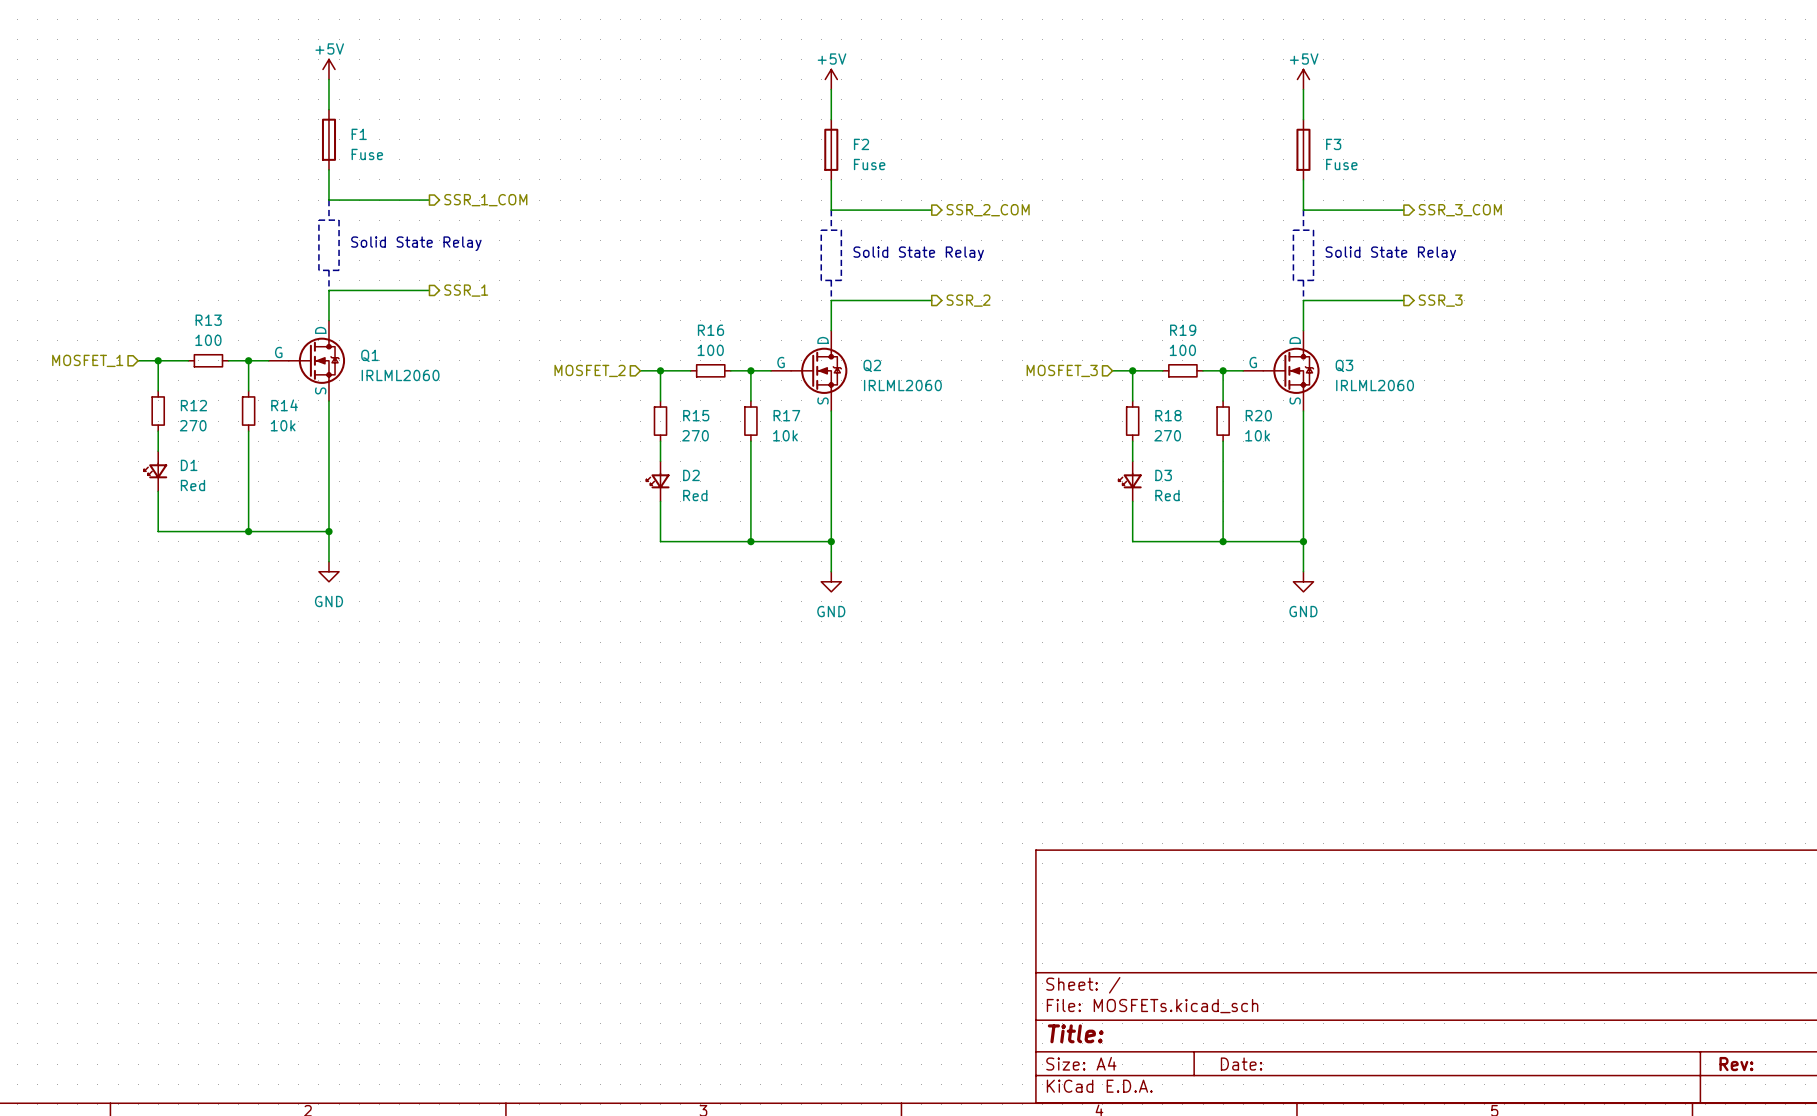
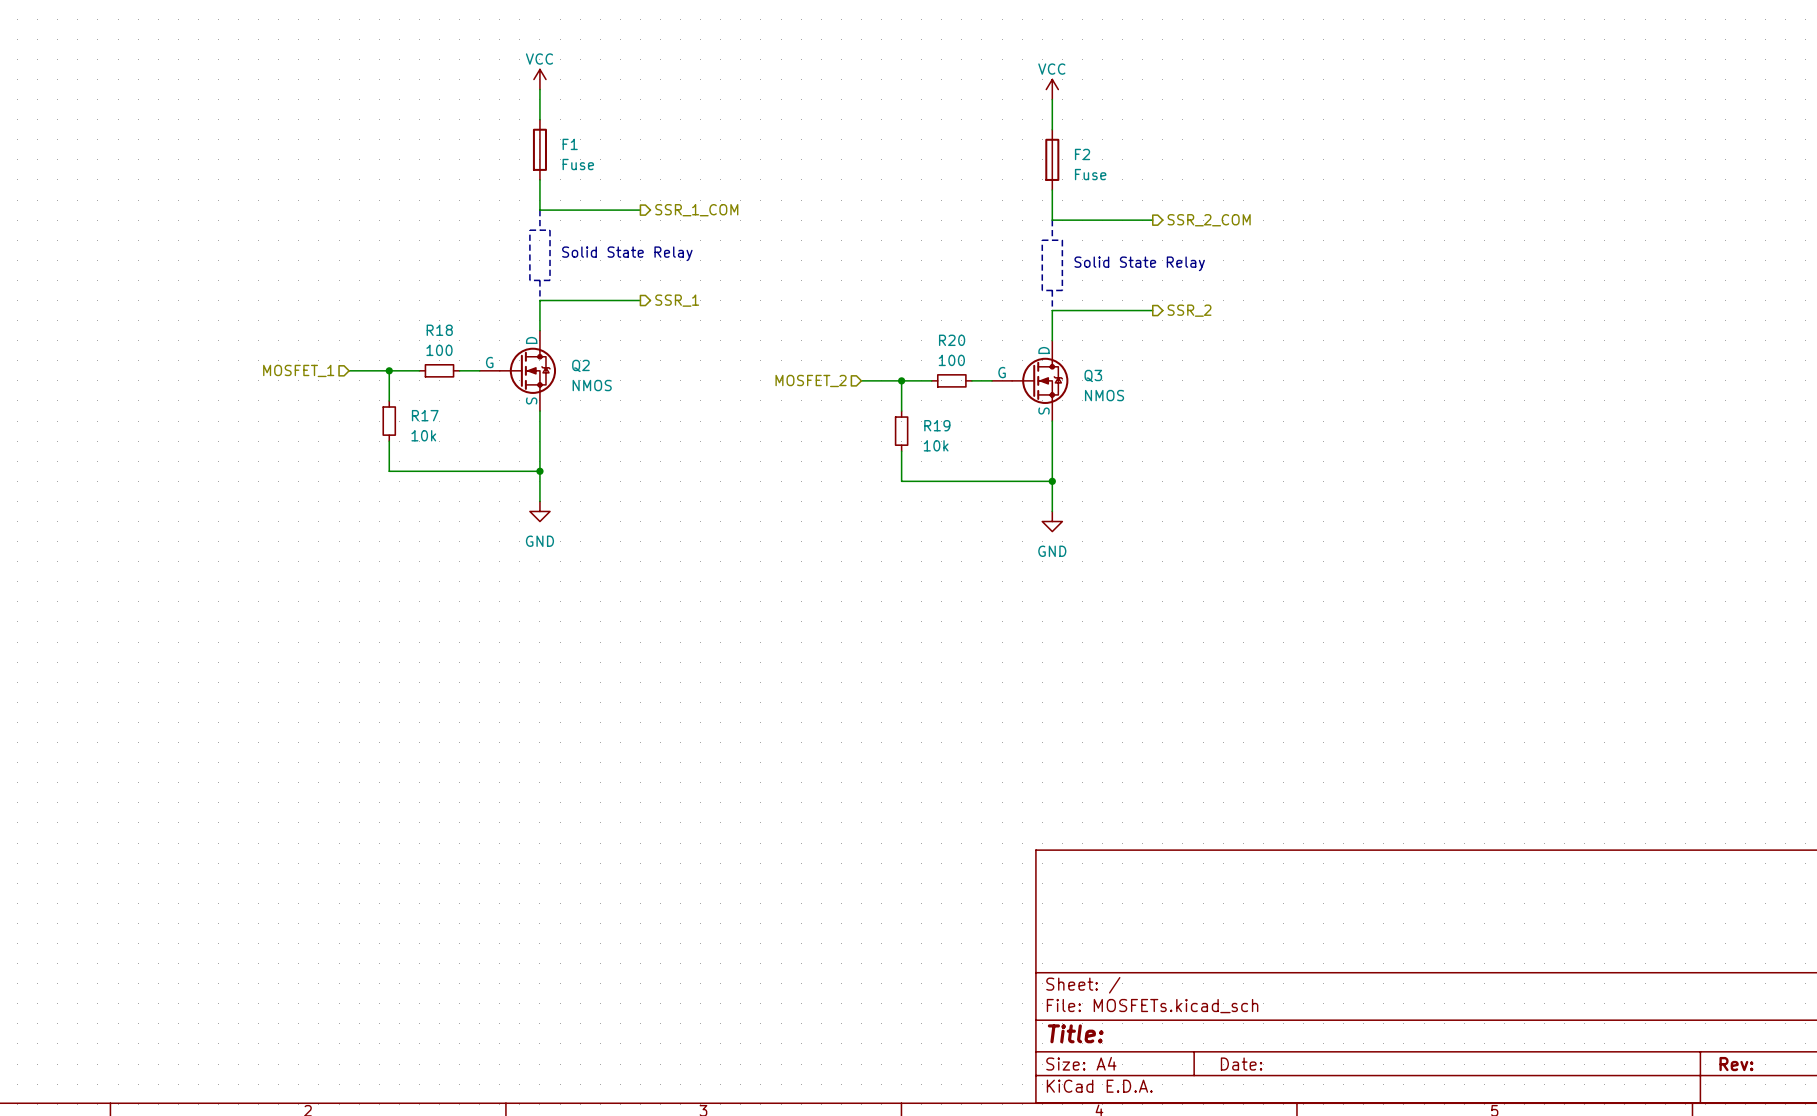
power symbol: +5V (328, 69) -> none
wire: (328, 79) (328, 109) -> none
power symbol: none -> VCC (539, 79)
power symbol: +5V (831, 79) -> none
power symbol: +5V (1303, 79) -> none
wire: none -> (539, 89) (539, 119)
wire: (831, 89) (831, 119) -> none
power symbol: none -> VCC (1052, 89)
wire: (1303, 89) (1303, 119) -> none
wire: none -> (1052, 99) (1052, 129)
F1 position: (328, 139) -> (539, 149)
F2 position: (831, 149) -> (1052, 159)
F3: Fuse (1303, 149) -> none
wire: (328, 169) (328, 200) (429, 200) -> none
wire: none -> (539, 179) (539, 210) (640, 210)
wire: (831, 179) (831, 210) (931, 210) -> none
wire: (1303, 179) (1303, 210) (1403, 210) -> none
wire: none -> (1052, 190) (1052, 220) (1152, 220)
line: (328, 200) (328, 220) -> none
hierarchical label: SSR_1_COM (485, 200) -> none
line: none -> (539, 210) (539, 230)
hierarchical label: none -> SSR_1_COM (696, 210)
line: (831, 210) (831, 230) -> none
hierarchical label: SSR_2_COM (988, 210) -> none
line: (1303, 210) (1303, 230) -> none
hierarchical label: SSR_3_COM (1460, 210) -> none
line: (318, 220) (339, 220) (339, 270) (318, 270) (318, 220) -> none
line: none -> (1052, 220) (1052, 240)
hierarchical label: none -> SSR_2_COM (1209, 220)
line: none -> (529, 230) (550, 230) (550, 280) (529, 280) (529, 230)
line: (821, 230) (841, 230) (841, 280) (821, 280) (821, 230) -> none
line: (1293, 230) (1313, 230) (1313, 280) (1293, 280) (1293, 230) -> none
line: none -> (1042, 240) (1062, 240) (1062, 290) (1042, 290) (1042, 240)
text: Solid State Relay (416, 243) -> none
text: none -> Solid State Relay (627, 253)
text: Solid State Relay (918, 253) -> none
text: Solid State Relay (1390, 253) -> none
text: none -> Solid State Relay (1139, 263)
line: (328, 270) (328, 290) -> none
line: none -> (539, 280) (539, 300)
line: (831, 280) (831, 300) -> none
line: (1303, 280) (1303, 300) -> none
wire: (429, 290) (328, 290) (328, 320) -> none
hierarchical label: SSR_1 (466, 290) -> none
line: none -> (1052, 290) (1052, 310)
wire: none -> (640, 300) (539, 300) (539, 330)
hierarchical label: none -> SSR_1 (677, 300)
wire: (931, 300) (831, 300) (831, 330) -> none
hierarchical label: SSR_2 (968, 300) -> none
wire: (1403, 300) (1303, 300) (1303, 330) -> none
hierarchical label: SSR_3 (1440, 300) -> none
wire: none -> (1152, 310) (1052, 310) (1052, 340)
hierarchical label: none -> SSR_2 (1189, 310)
R19 value: 100 (1182, 350) -> 10k (936, 445)
hierarchical label: MOSFET_1 (87, 360) -> none
wire: (138, 360) (188, 360) -> none
wire: (158, 360) (158, 390) -> none
junction: (158, 360) -> none
R13: 100 (208, 360) -> none
wire: (228, 360) (268, 360) -> none
wire: (248, 360) (248, 390) -> (389, 370) (389, 400)
junction: (248, 360) -> none
Q1: IRLML2060 (306, 360) -> none
hierarchical label: none -> MOSFET_1 (298, 370)
wire: none -> (349, 370) (419, 370)
junction: none -> (389, 370)
wire: none -> (459, 370) (479, 370)
hierarchical label: MOSFET_2 (590, 370) -> none
wire: (640, 370) (690, 370) -> none
wire: (660, 370) (660, 400) -> none
junction: (660, 370) -> none
R16: 100 (710, 370) -> none
wire: (730, 370) (771, 370) -> none
wire: (750, 370) (750, 400) -> (901, 380) (901, 411)
junction: (750, 370) -> none
Q2 position: (809, 370) -> (517, 370)
hierarchical label: MOSFET_3 (1062, 370) -> none
wire: (1112, 370) (1162, 370) -> none
wire: (1132, 370) (1132, 400) -> none
junction: (1132, 370) -> none
R19 rotation: 0° (1182, 370) -> 90° clockwise (901, 431)
R19 position: (1182, 370) -> (901, 431)
wire: (1203, 370) (1243, 370) -> none
wire: (1223, 370) (1223, 400) -> none
junction: (1223, 370) -> none
Q3 position: (1281, 370) -> (1030, 380)
hierarchical label: none -> MOSFET_2 (811, 380)
wire: none -> (861, 380) (931, 380)
junction: none -> (901, 380)
wire: none -> (971, 380) (992, 380)
Q2 value: IRLML2060 (902, 385) -> NMOS (592, 385)
Q3 value: IRLML2060 (1375, 385) -> NMOS (1104, 395)
wire: (328, 400) (328, 561) -> none
R12: 270 (158, 411) -> none
R14: 10k (248, 411) -> none
wire: none -> (539, 411) (539, 501)
wire: (831, 411) (831, 571) -> none
wire: (1303, 411) (1303, 571) -> none
R18 name position: R18 (1168, 415) -> R18 (439, 330)
R20 name position: R20 (1258, 415) -> R20 (952, 340)
R15: 270 (660, 421) -> none
R17 position: (750, 421) -> (389, 421)
wire: none -> (1052, 421) (1052, 511)
R18 rotation: 0° (1132, 421) -> 90° clockwise (439, 370)
R18 position: (1132, 421) -> (439, 370)
R20 rotation: 0° (1223, 421) -> 90° clockwise (951, 380)
R20 position: (1223, 421) -> (951, 380)
wire: (158, 431) (158, 451) -> none
wire: (248, 431) (248, 531) -> none
R18 value: 270 (1167, 435) -> 100 (439, 350)
R20 value: 10k (1257, 435) -> 100 (951, 360)
wire: none -> (389, 441) (389, 471) (539, 471)
wire: (660, 441) (660, 461) -> none
wire: (750, 441) (750, 541) -> none
wire: (1132, 441) (1132, 461) -> none
wire: (1223, 441) (1223, 541) -> none
wire: none -> (901, 451) (901, 481) (1052, 481)
D1: Red (155, 471) -> none
junction: none -> (539, 471)
D2: Red (658, 481) -> none
junction: none -> (1052, 481)
D3: Red (1130, 481) -> none
wire: (158, 491) (158, 531) (328, 531) -> none
wire: (660, 501) (660, 541) (831, 541) -> none
wire: (1132, 501) (1132, 541) (1303, 541) -> none
power symbol: none -> GND (539, 511)
power symbol: none -> GND (1052, 521)
junction: (248, 531) -> none
junction: (328, 531) -> none
junction: (750, 541) -> none
junction: (831, 541) -> none
junction: (1223, 541) -> none
junction: (1303, 541) -> none
power symbol: GND (328, 571) -> none
power symbol: GND (831, 581) -> none
power symbol: GND (1303, 581) -> none

